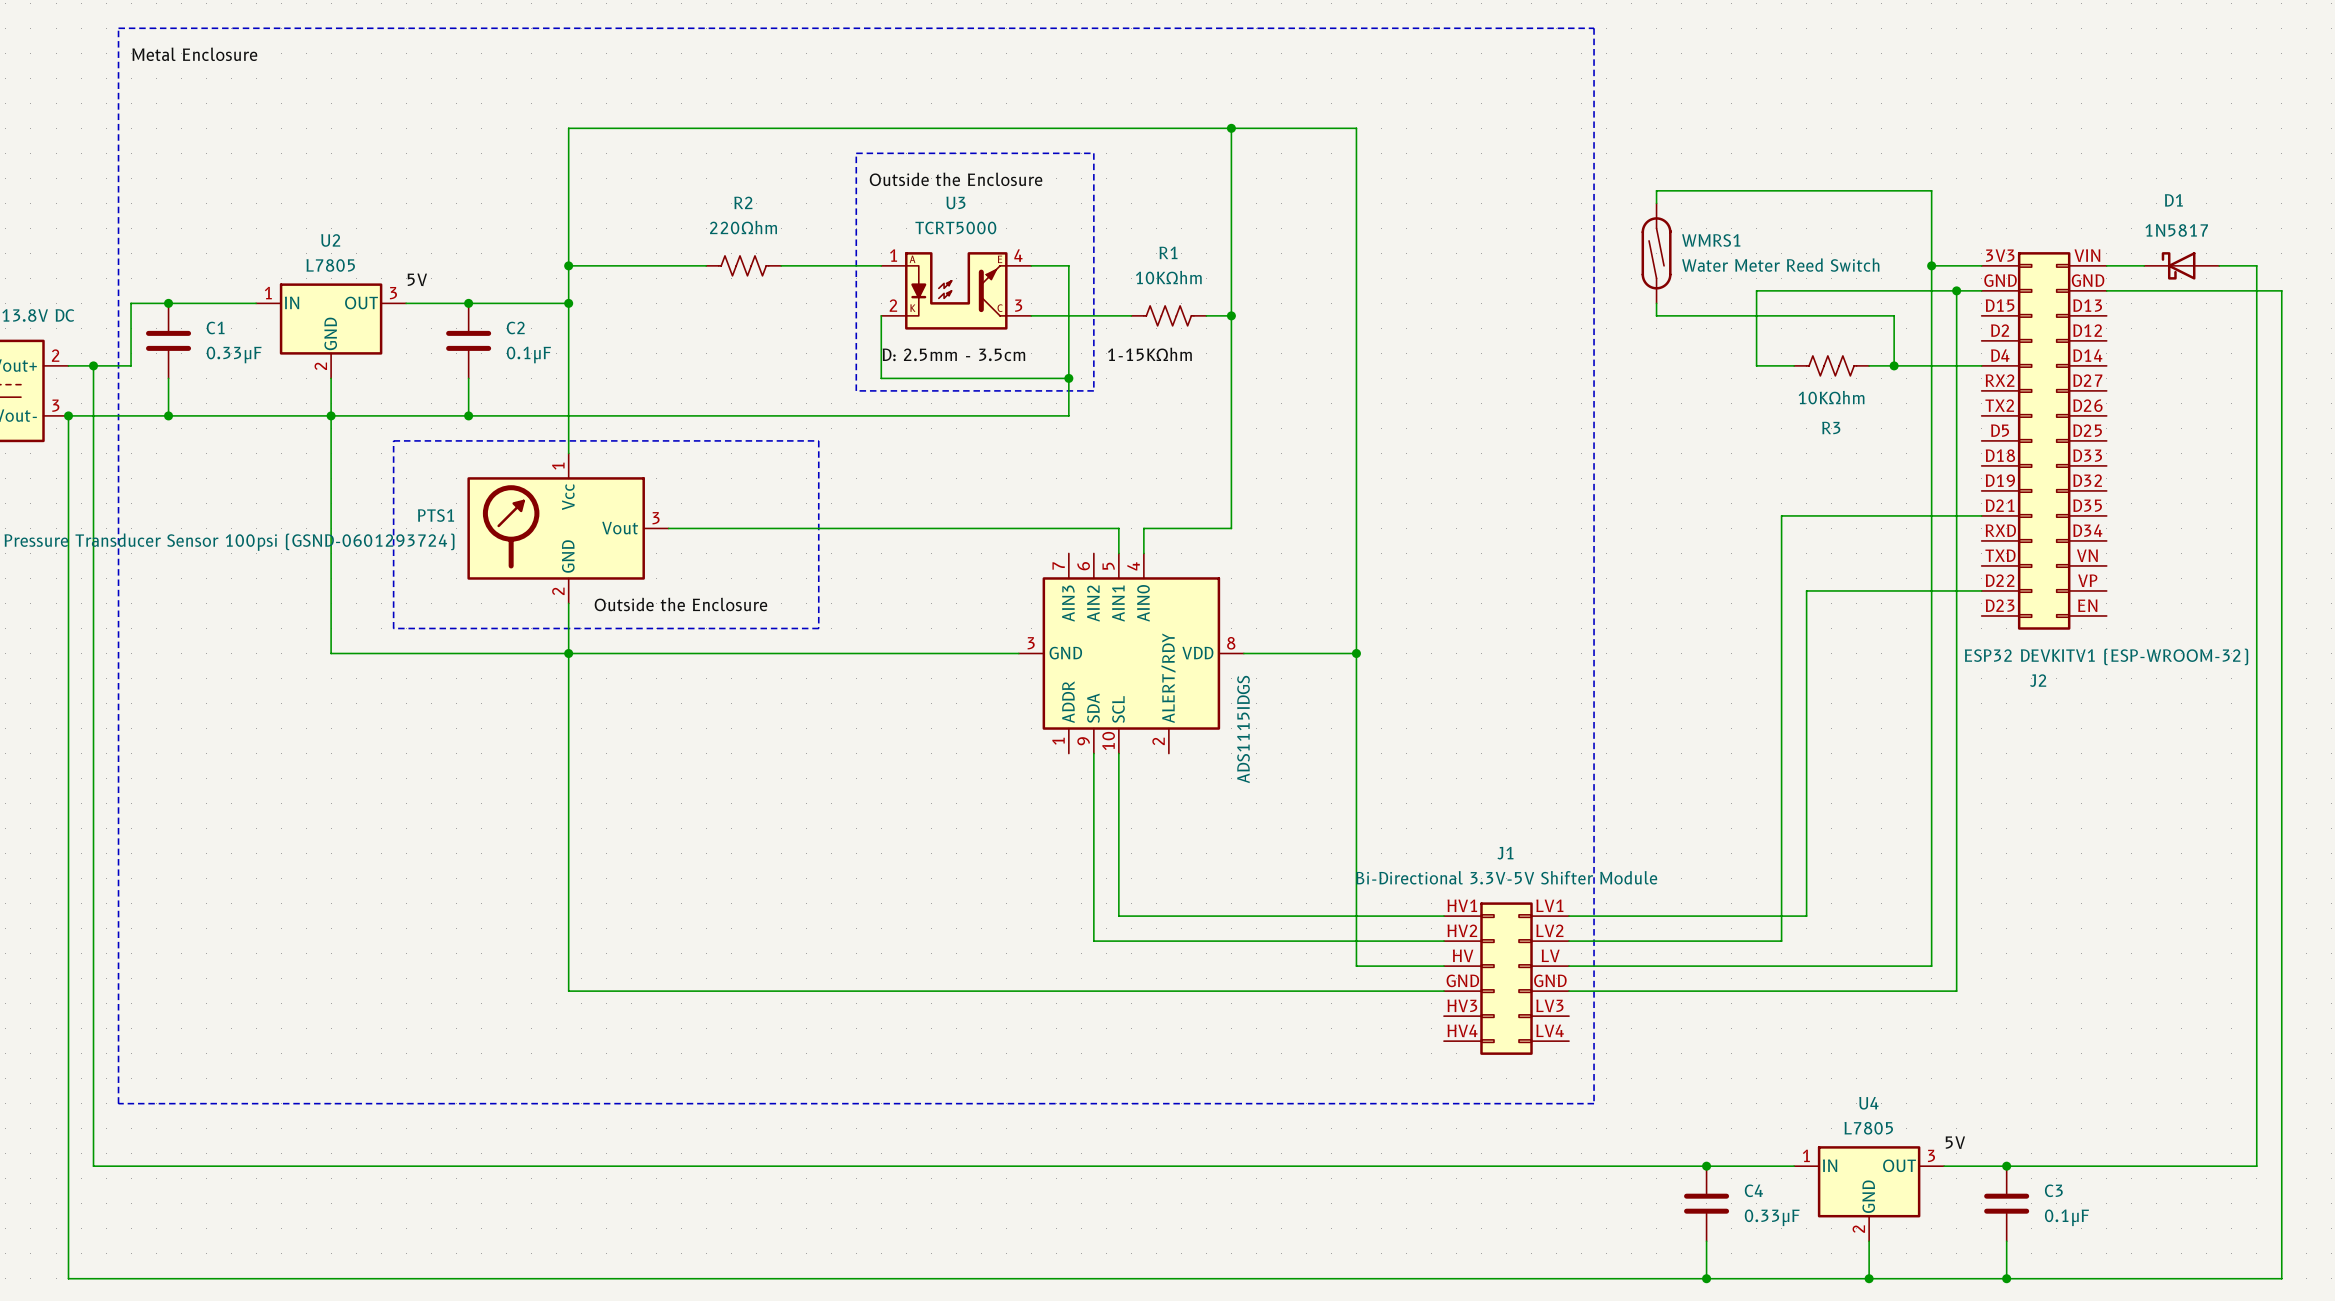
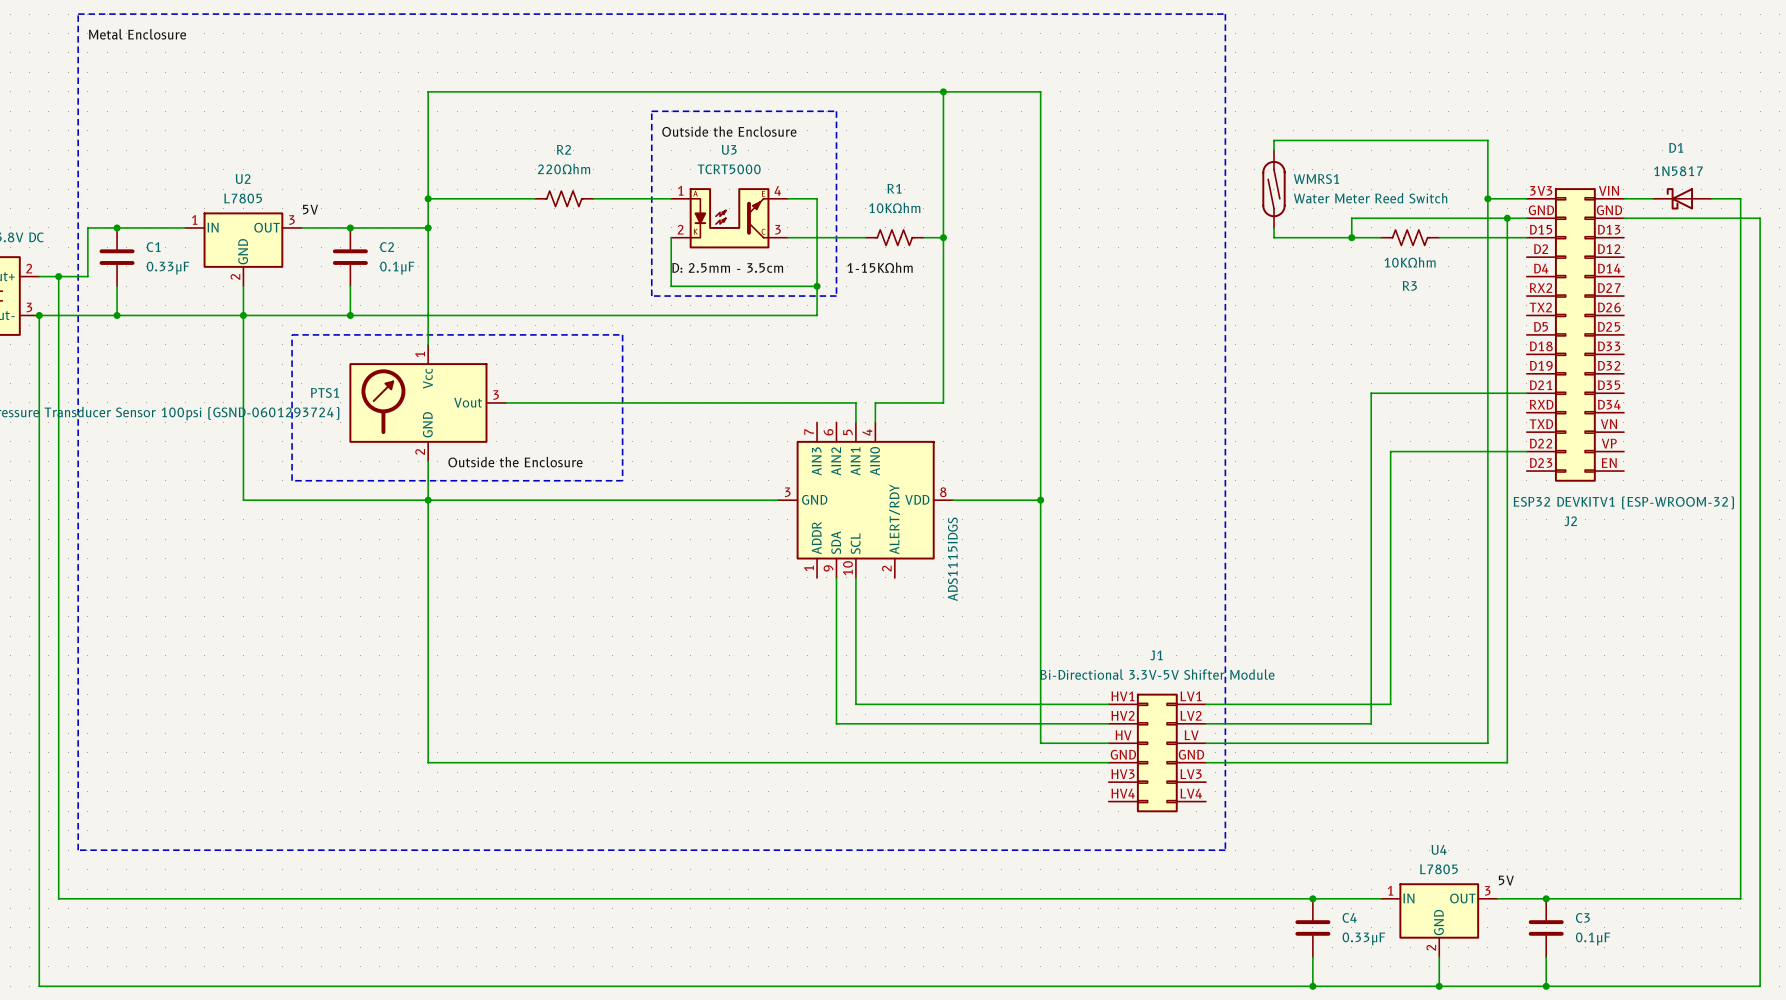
wire: (1756, 315) (1756, 365) (1794, 365) -> none
junction: none -> (1351, 237)
wire: (1894, 315) (1894, 365) -> (1458, 237) (1526, 237)
R3 position: (1831, 365) -> (1410, 237)
wire: (1869, 365) (1981, 365) -> none
junction: (1894, 365) -> none

